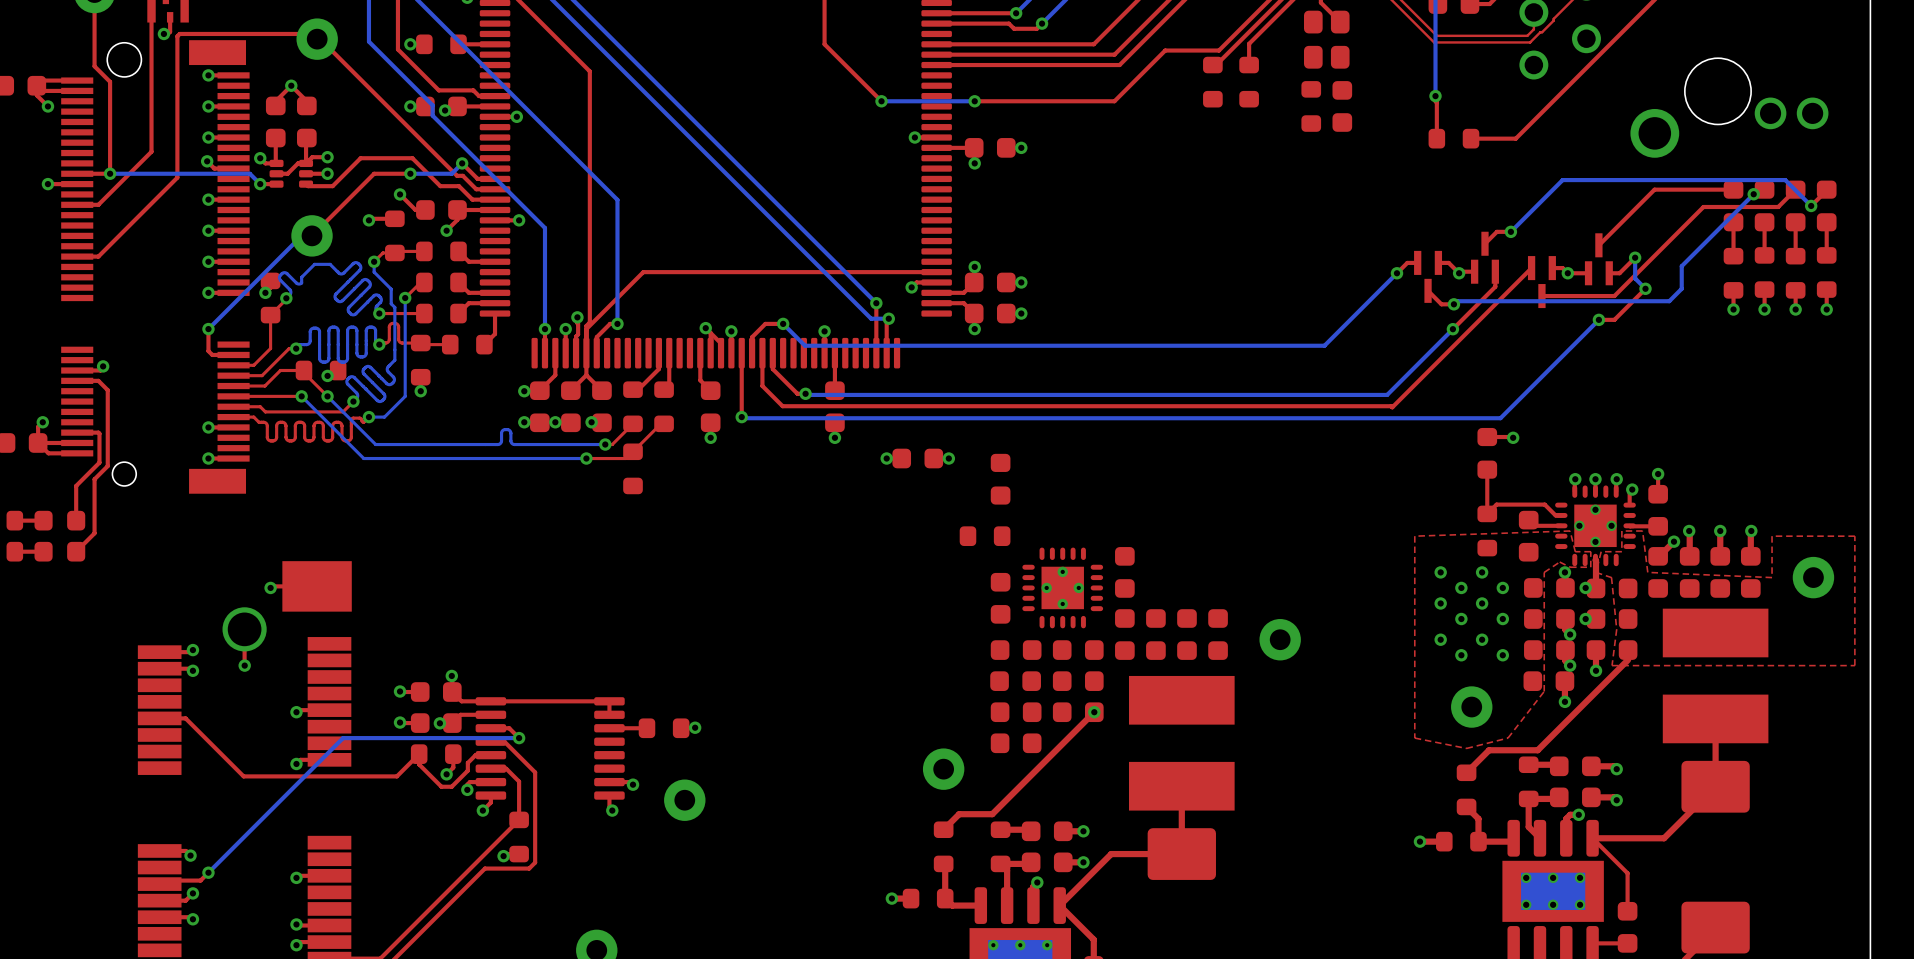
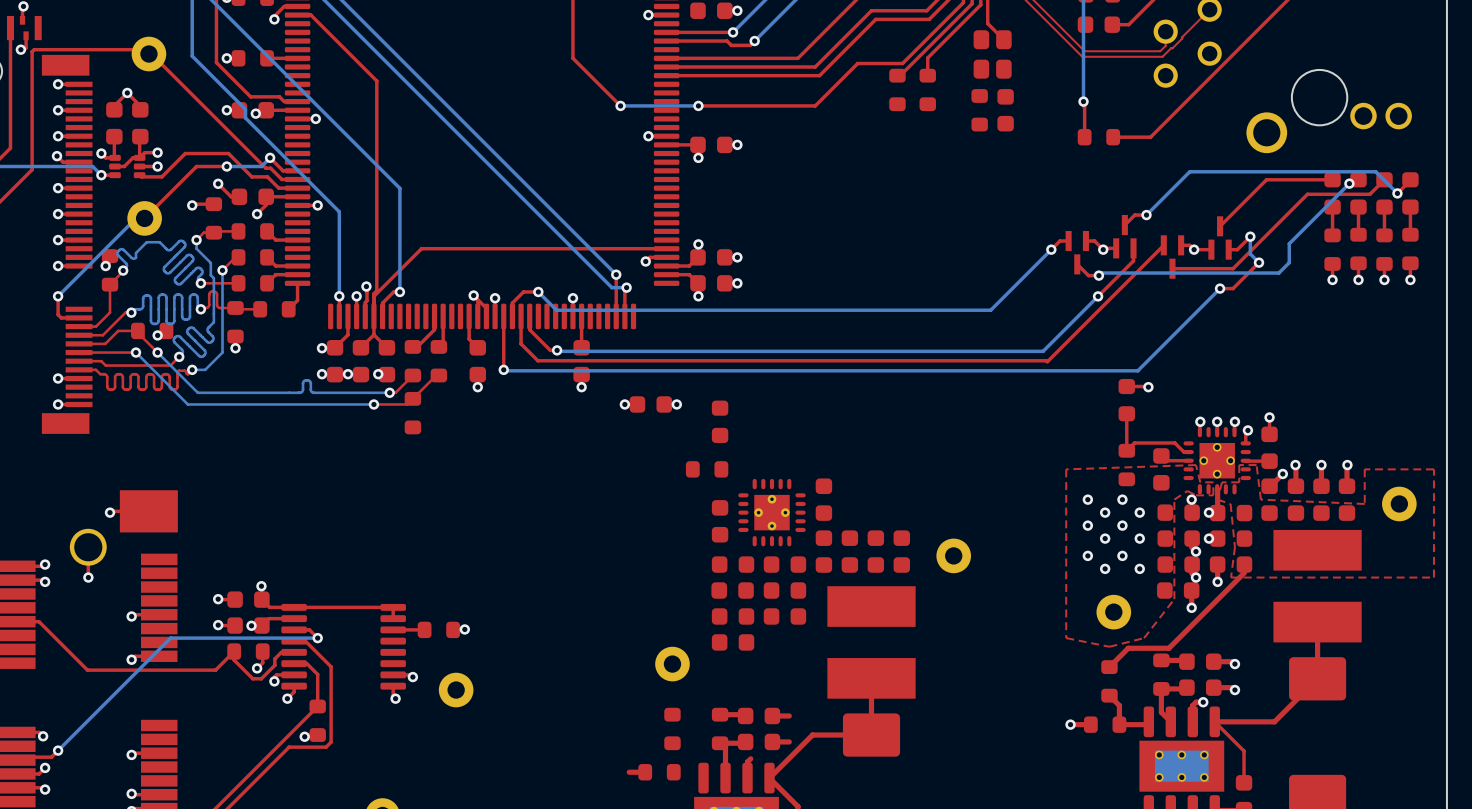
top track: (1094, 712) (992, 814) (959, 814) (943, 829) -> none
via: (1094, 712) -> none
via: (1083, 831) -> none
via: (1083, 862) -> none
top track: (943, 863) (945, 898) (952, 905) (980, 905) -> none
via: (1037, 882) -> none
via: (891, 898) -> none

